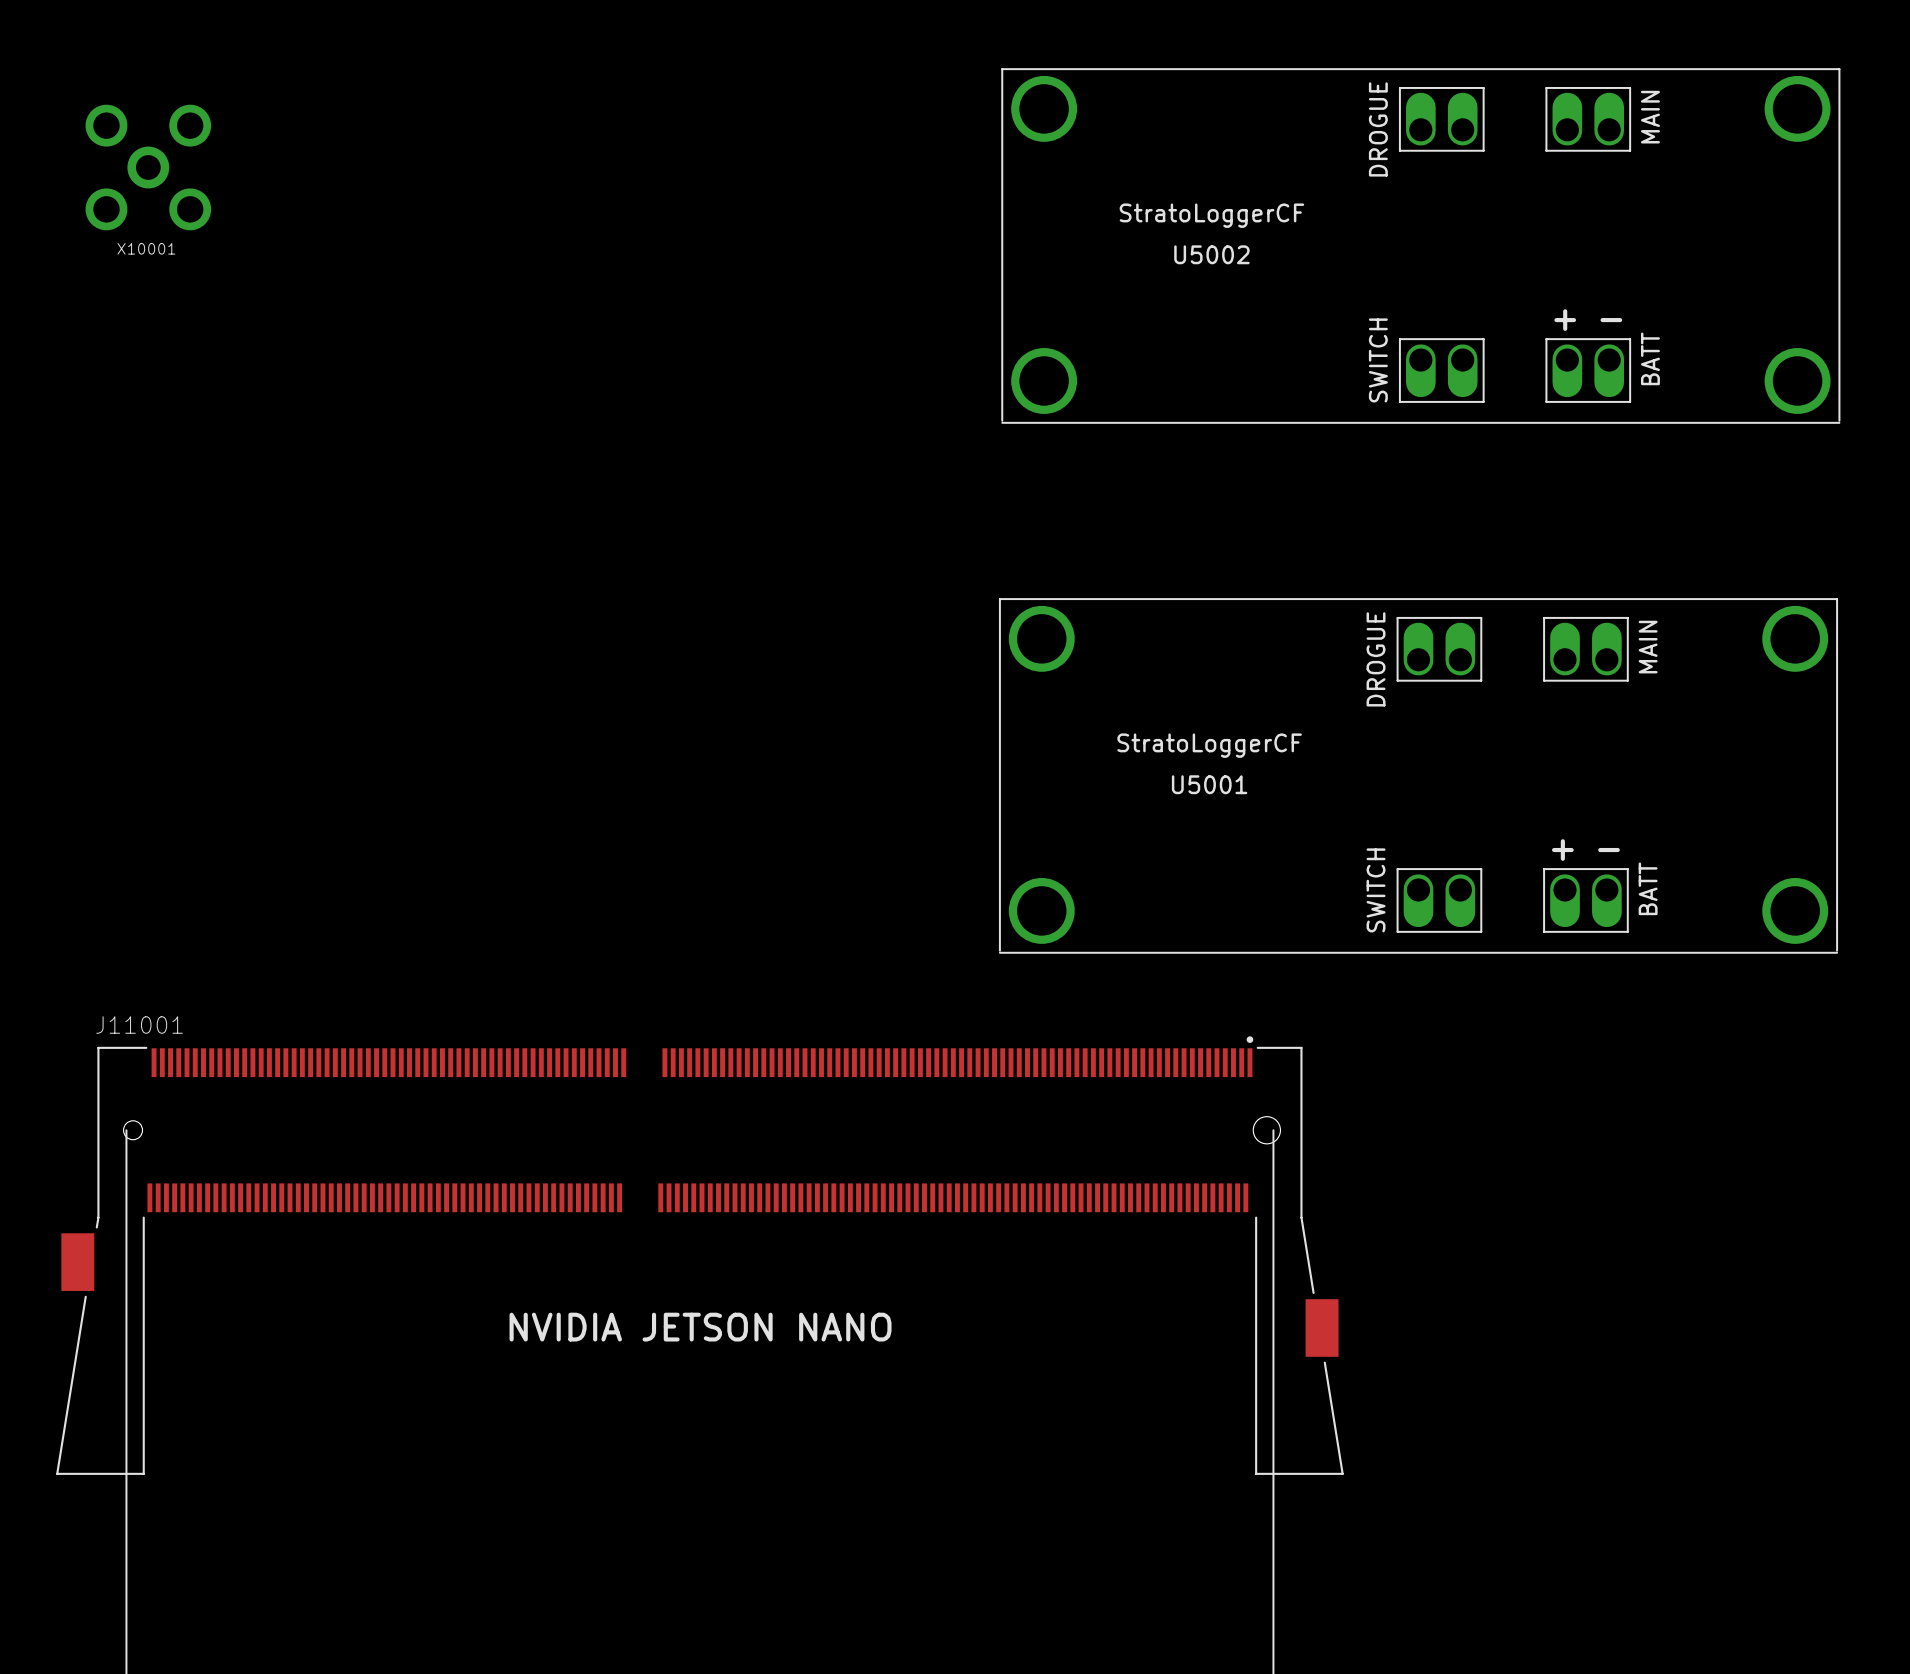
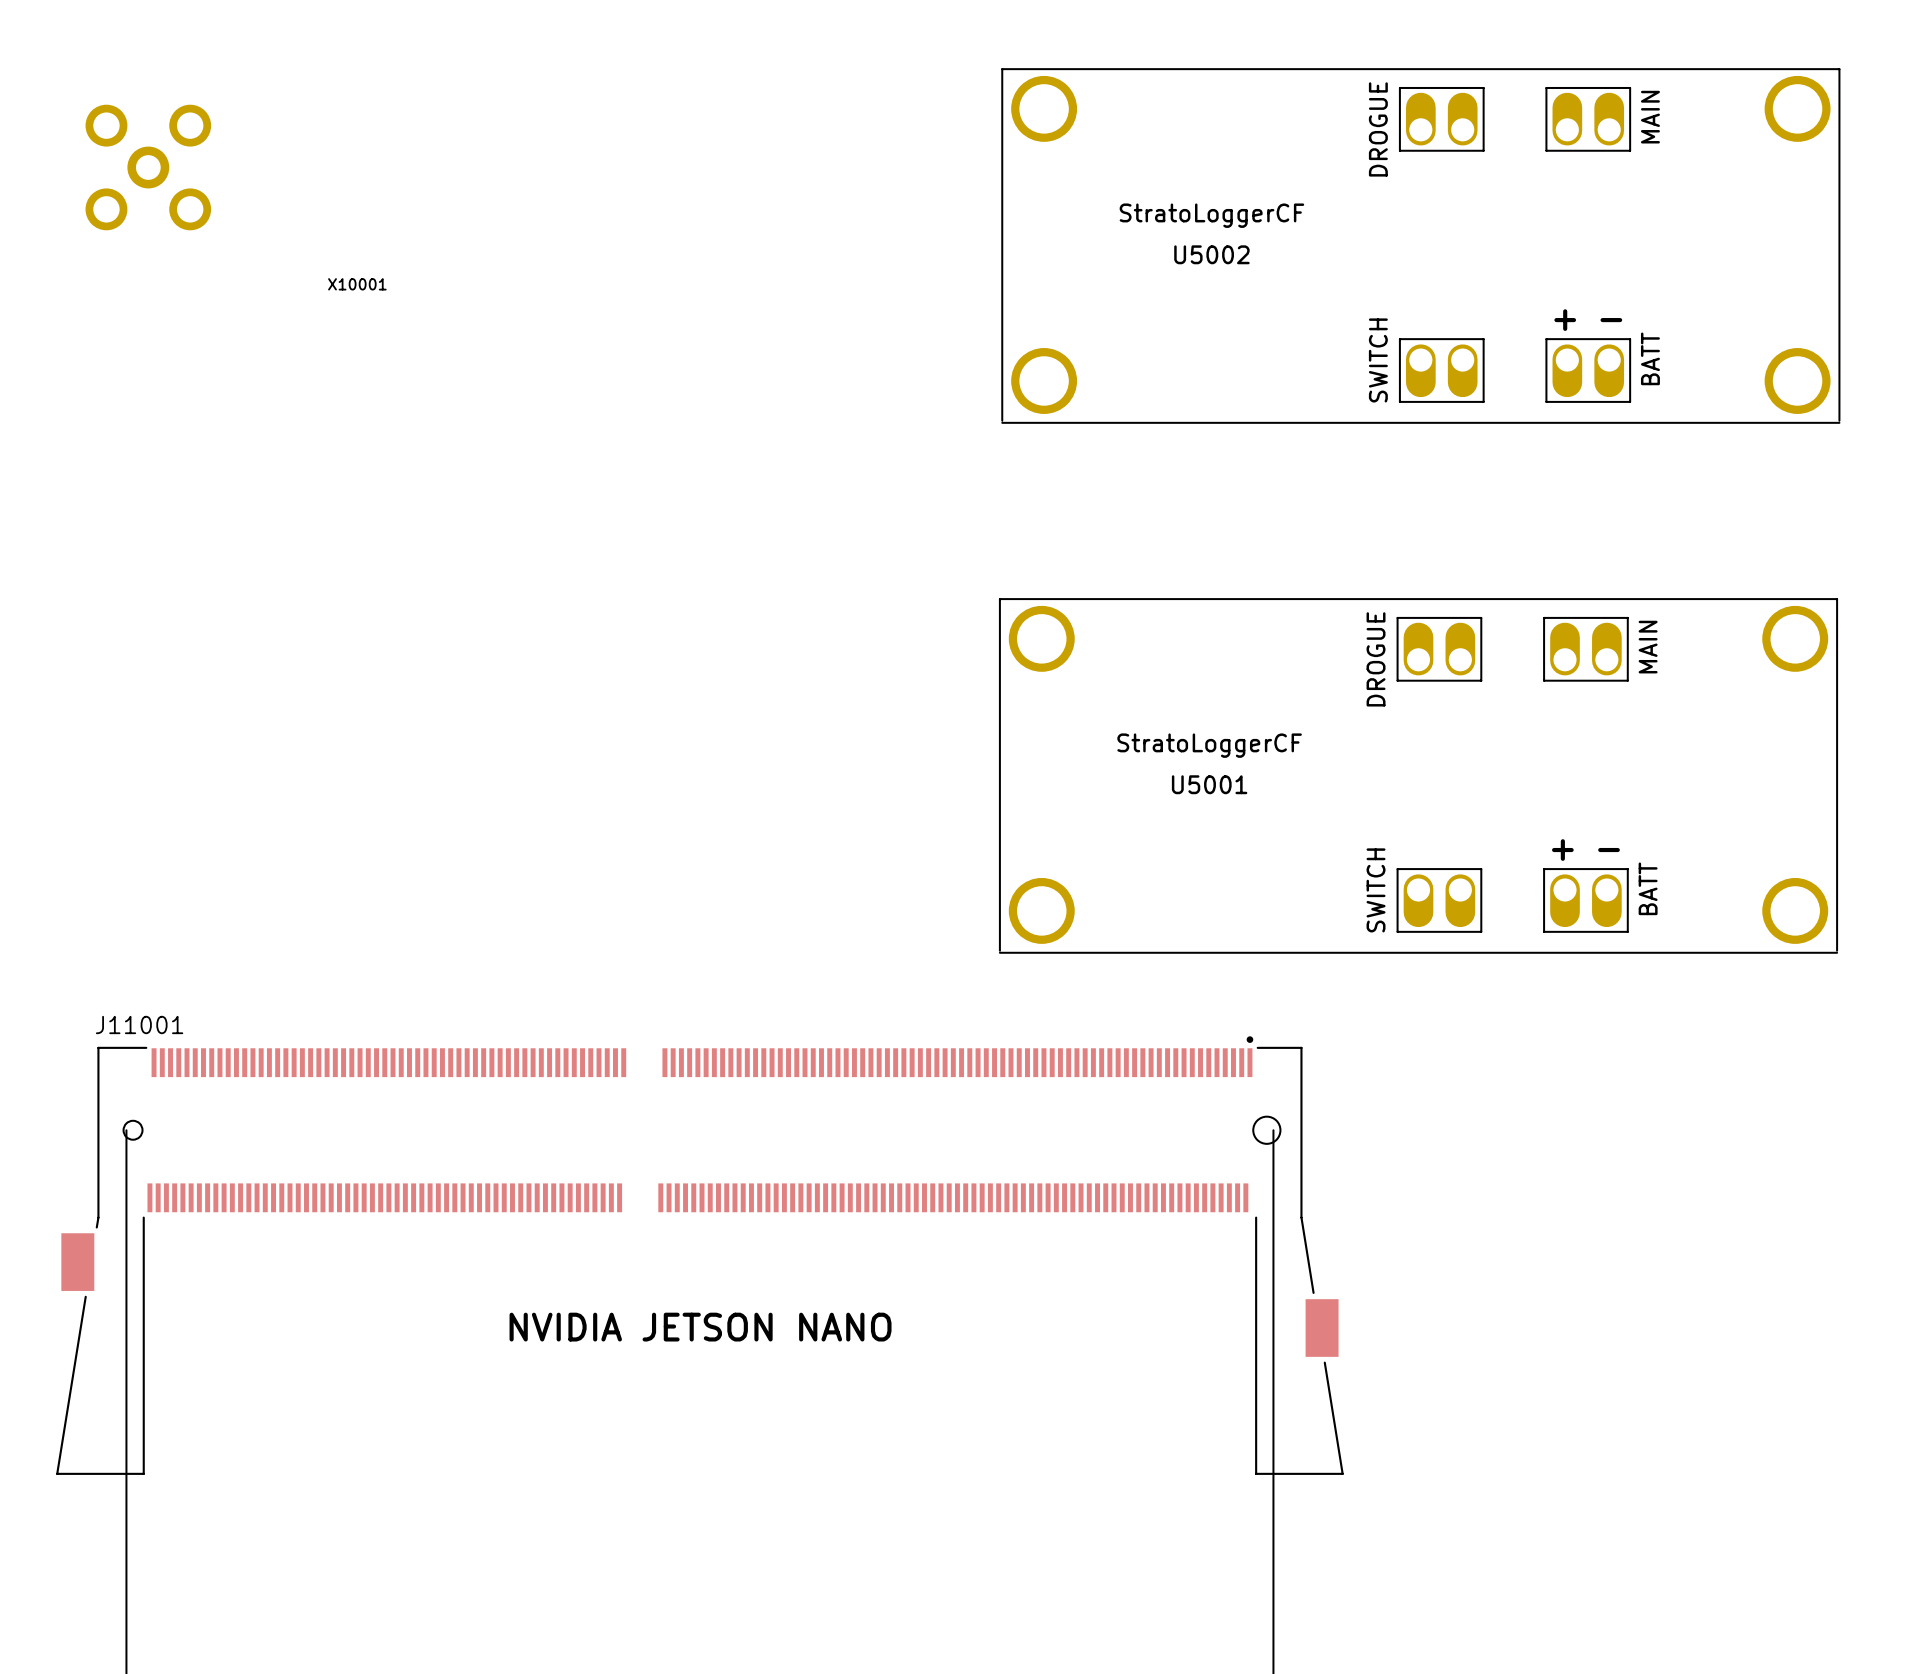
X10001 name position: X10001 (146, 248) -> X10001 (357, 284)

